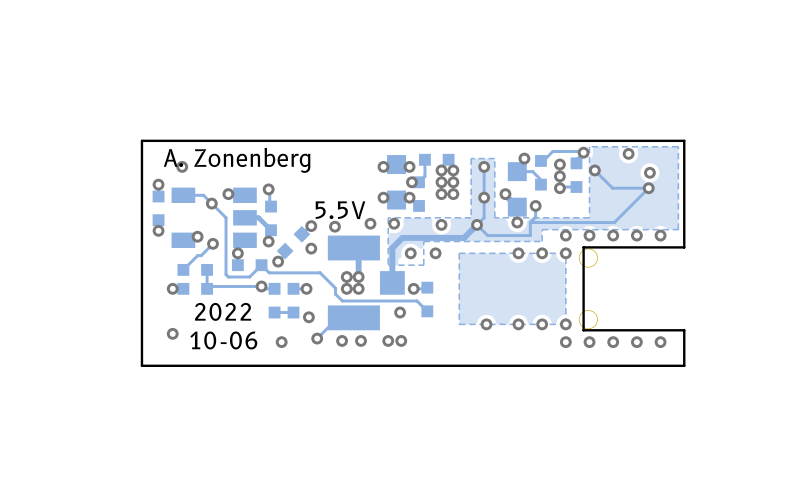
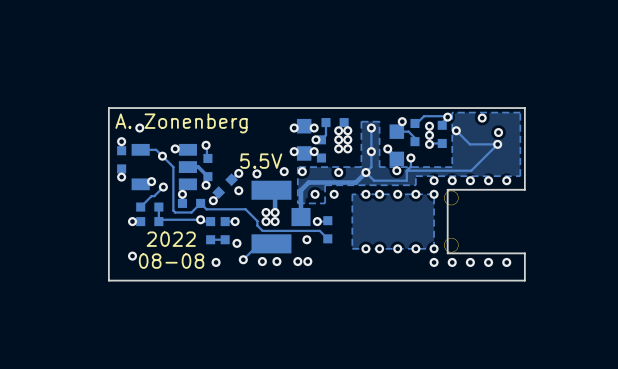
via: none -> (365, 194)
via: none -> (379, 194)
via: none -> (365, 248)
via: (486, 324) -> none
via: none -> (379, 248)
text: 10-06 (223, 340) -> 08-08 (171, 261)

